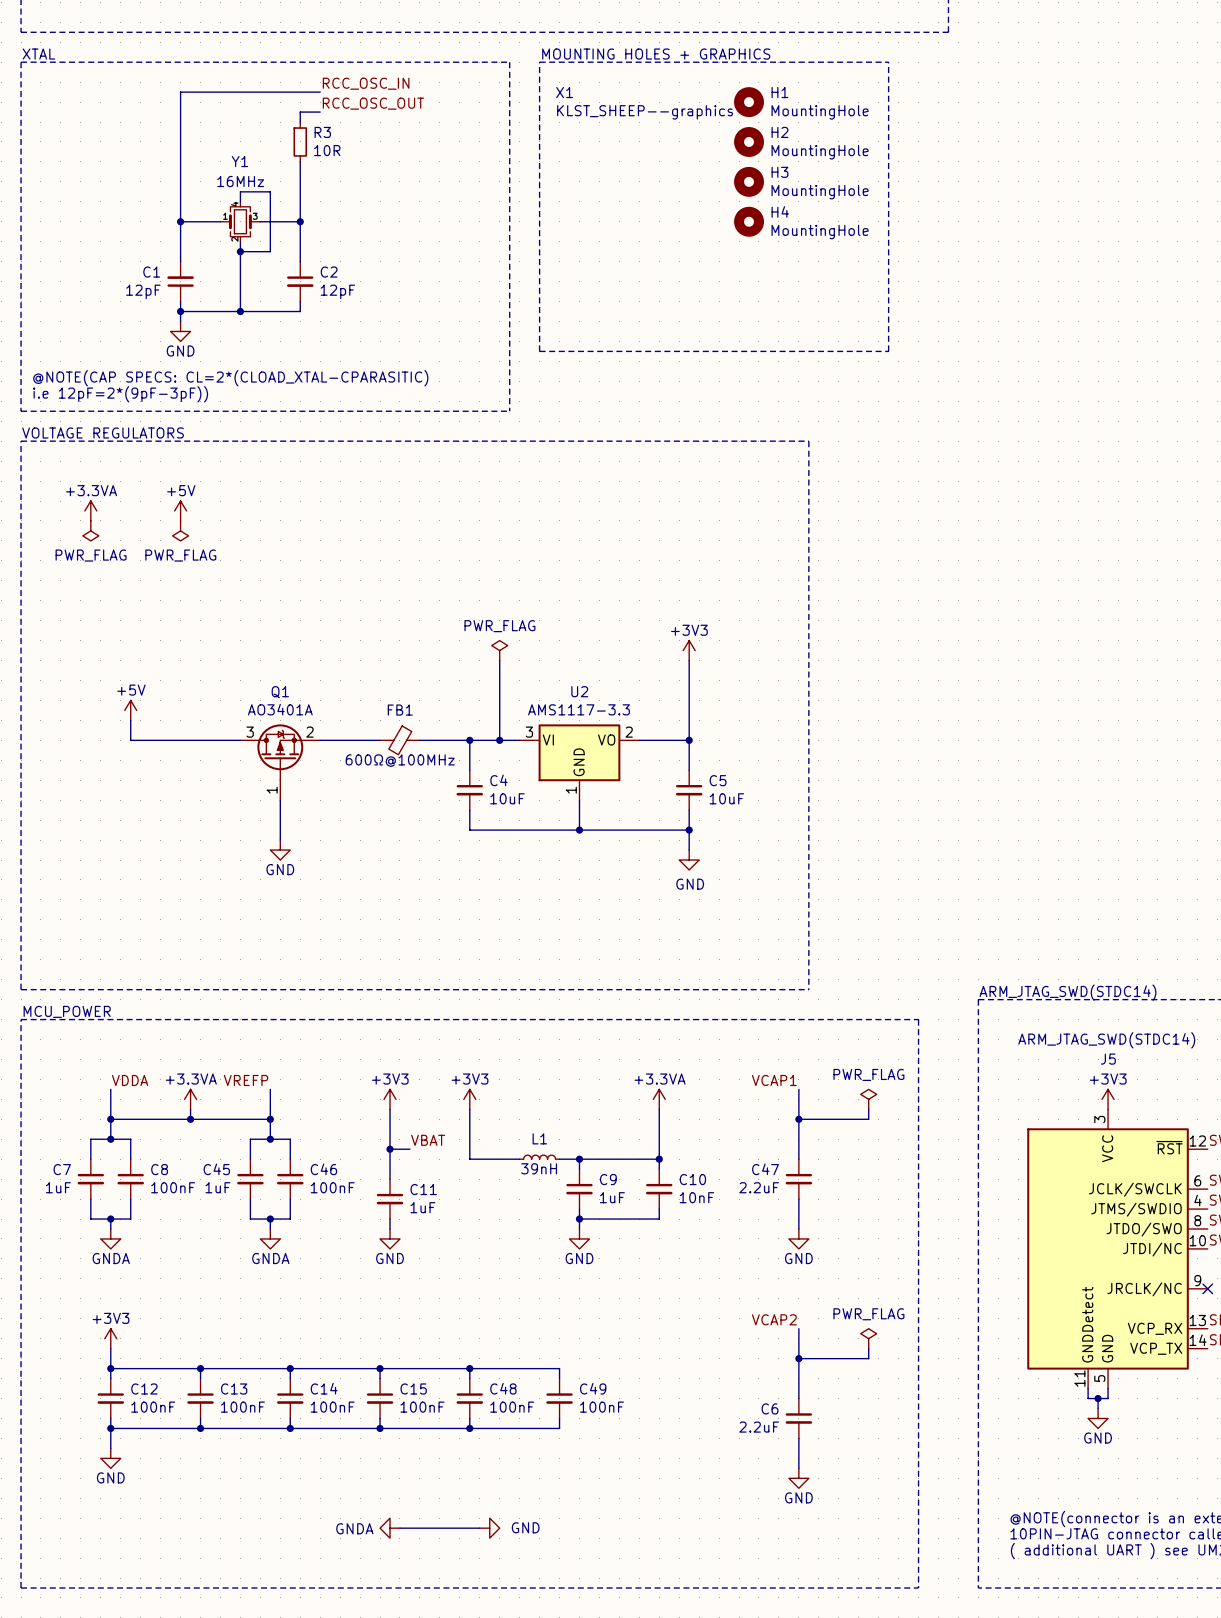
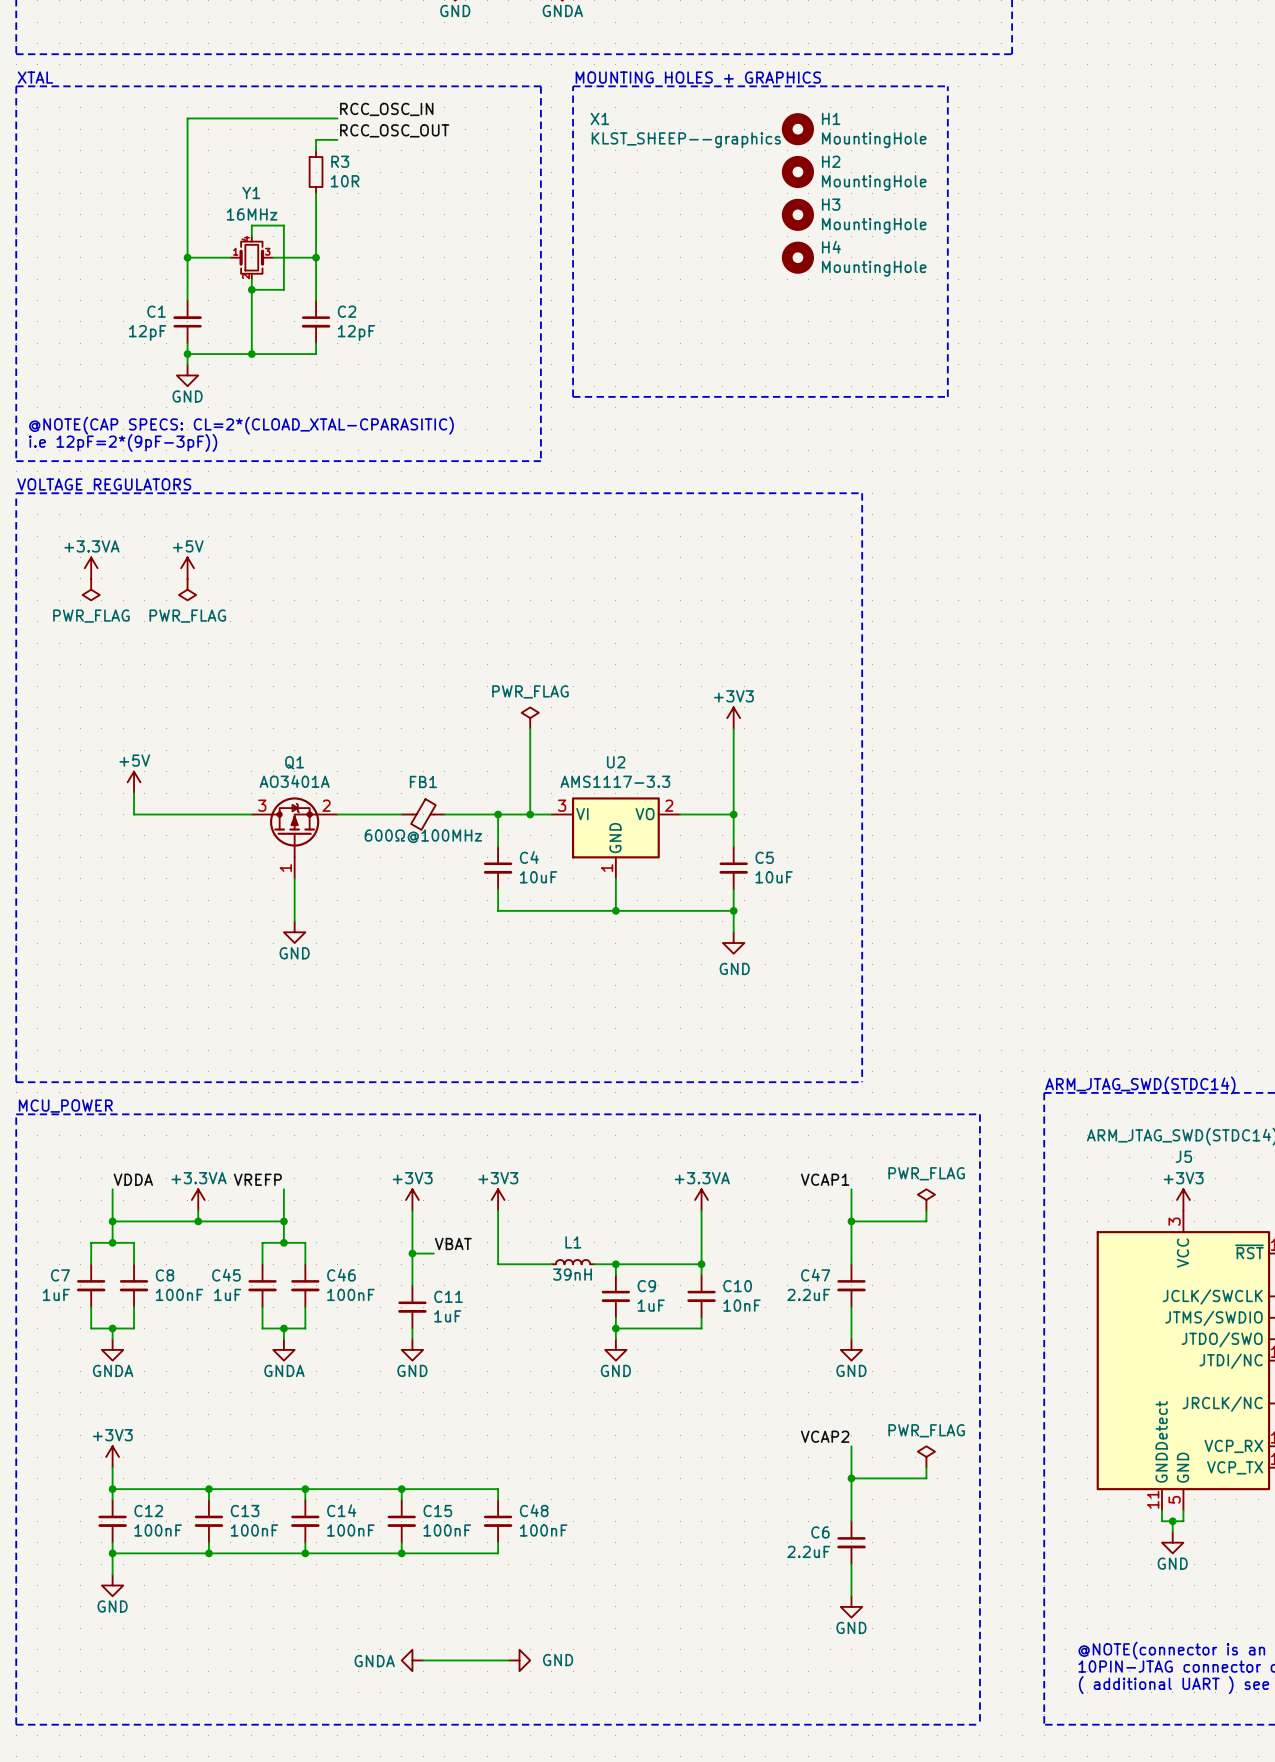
wire: (469, 1368) (559, 1368) (559, 1378) -> none
junction: (469, 1368) -> none
C49: 100nF (559, 1398) -> none
wire: (559, 1418) (559, 1428) (469, 1428) -> none
junction: (469, 1428) -> none

